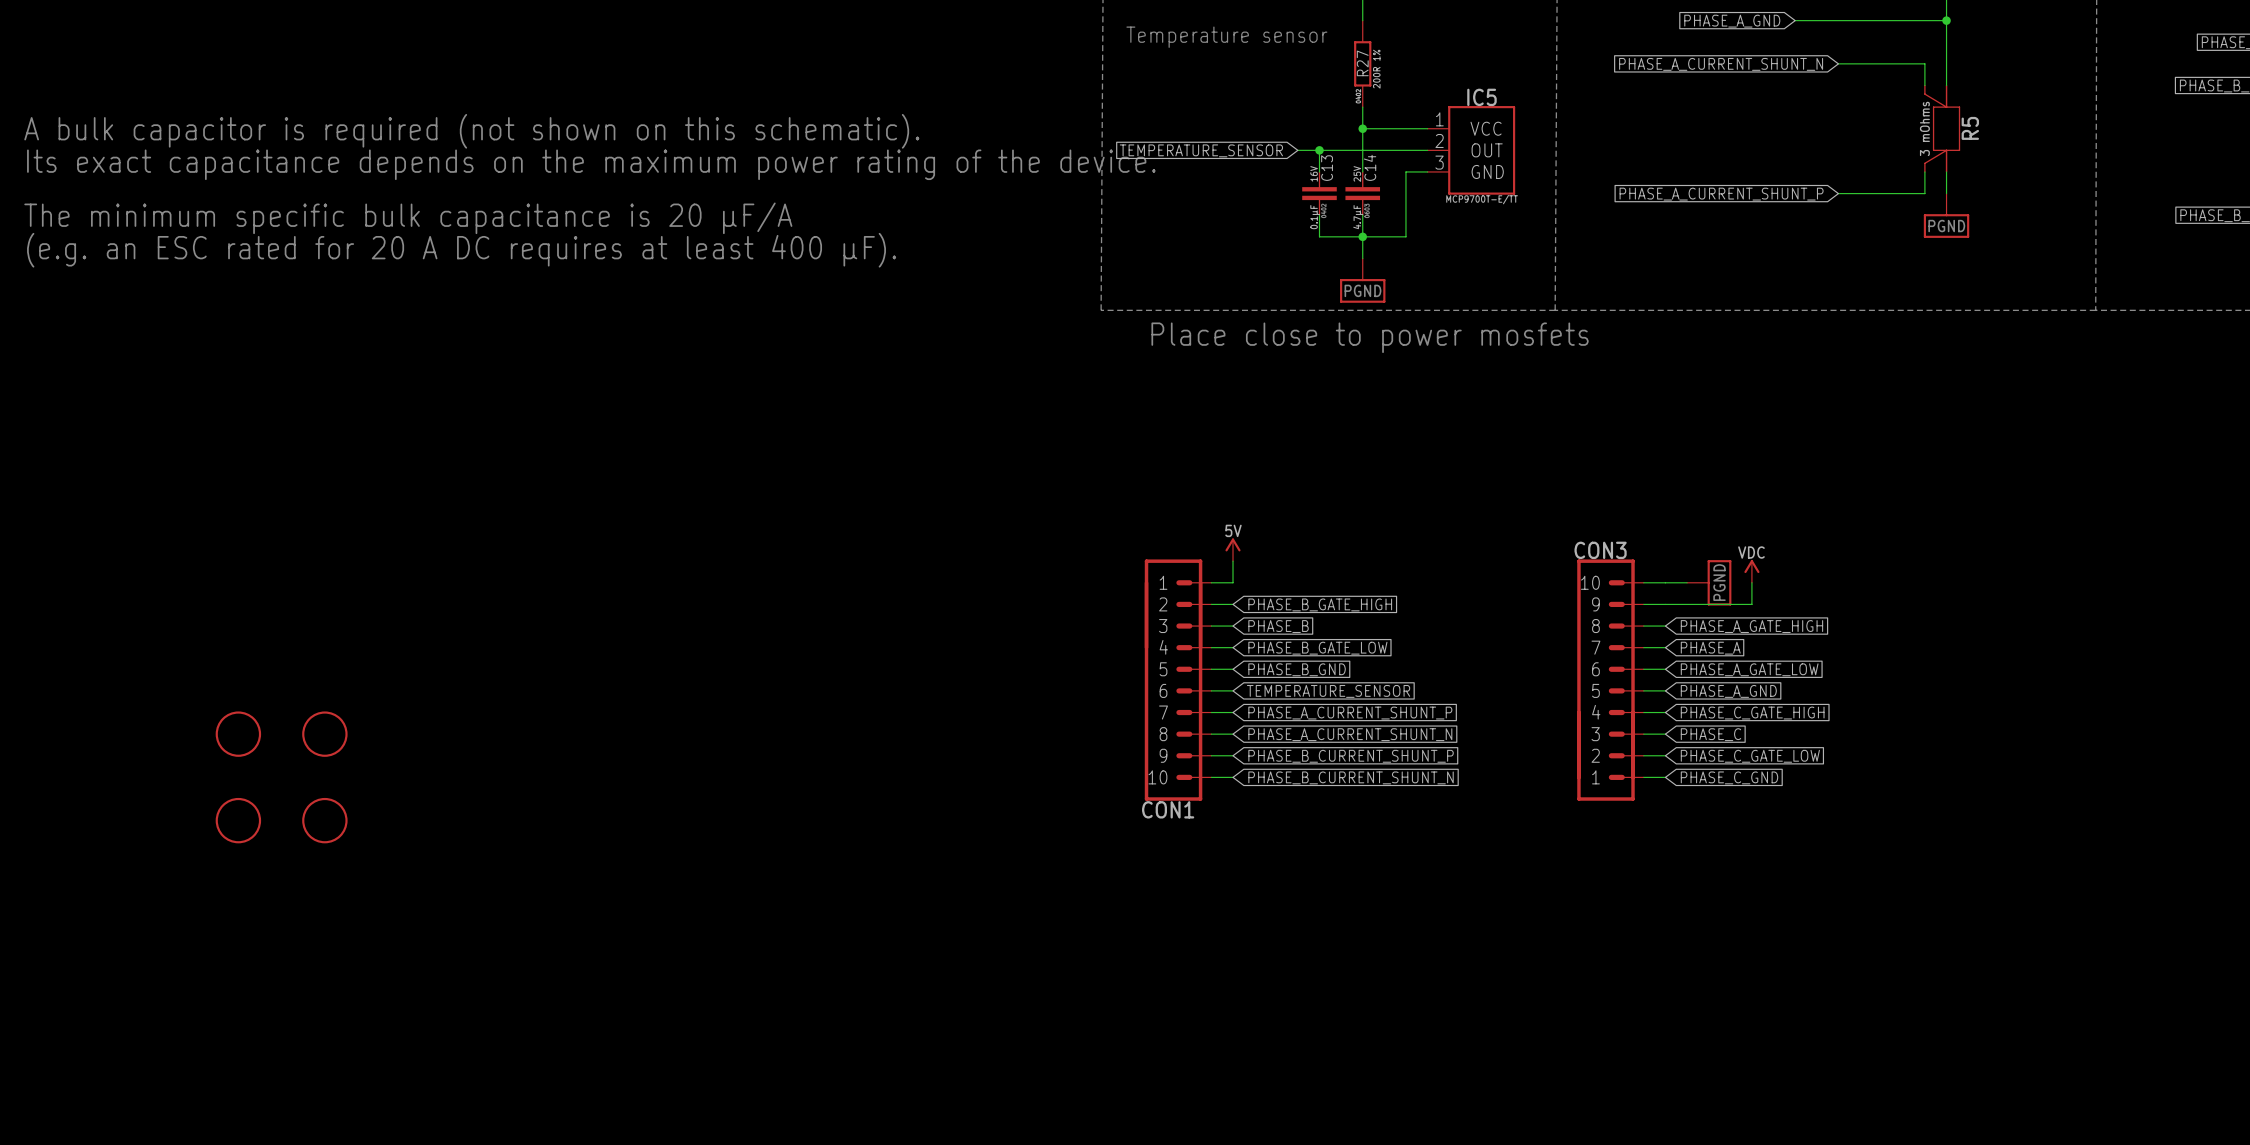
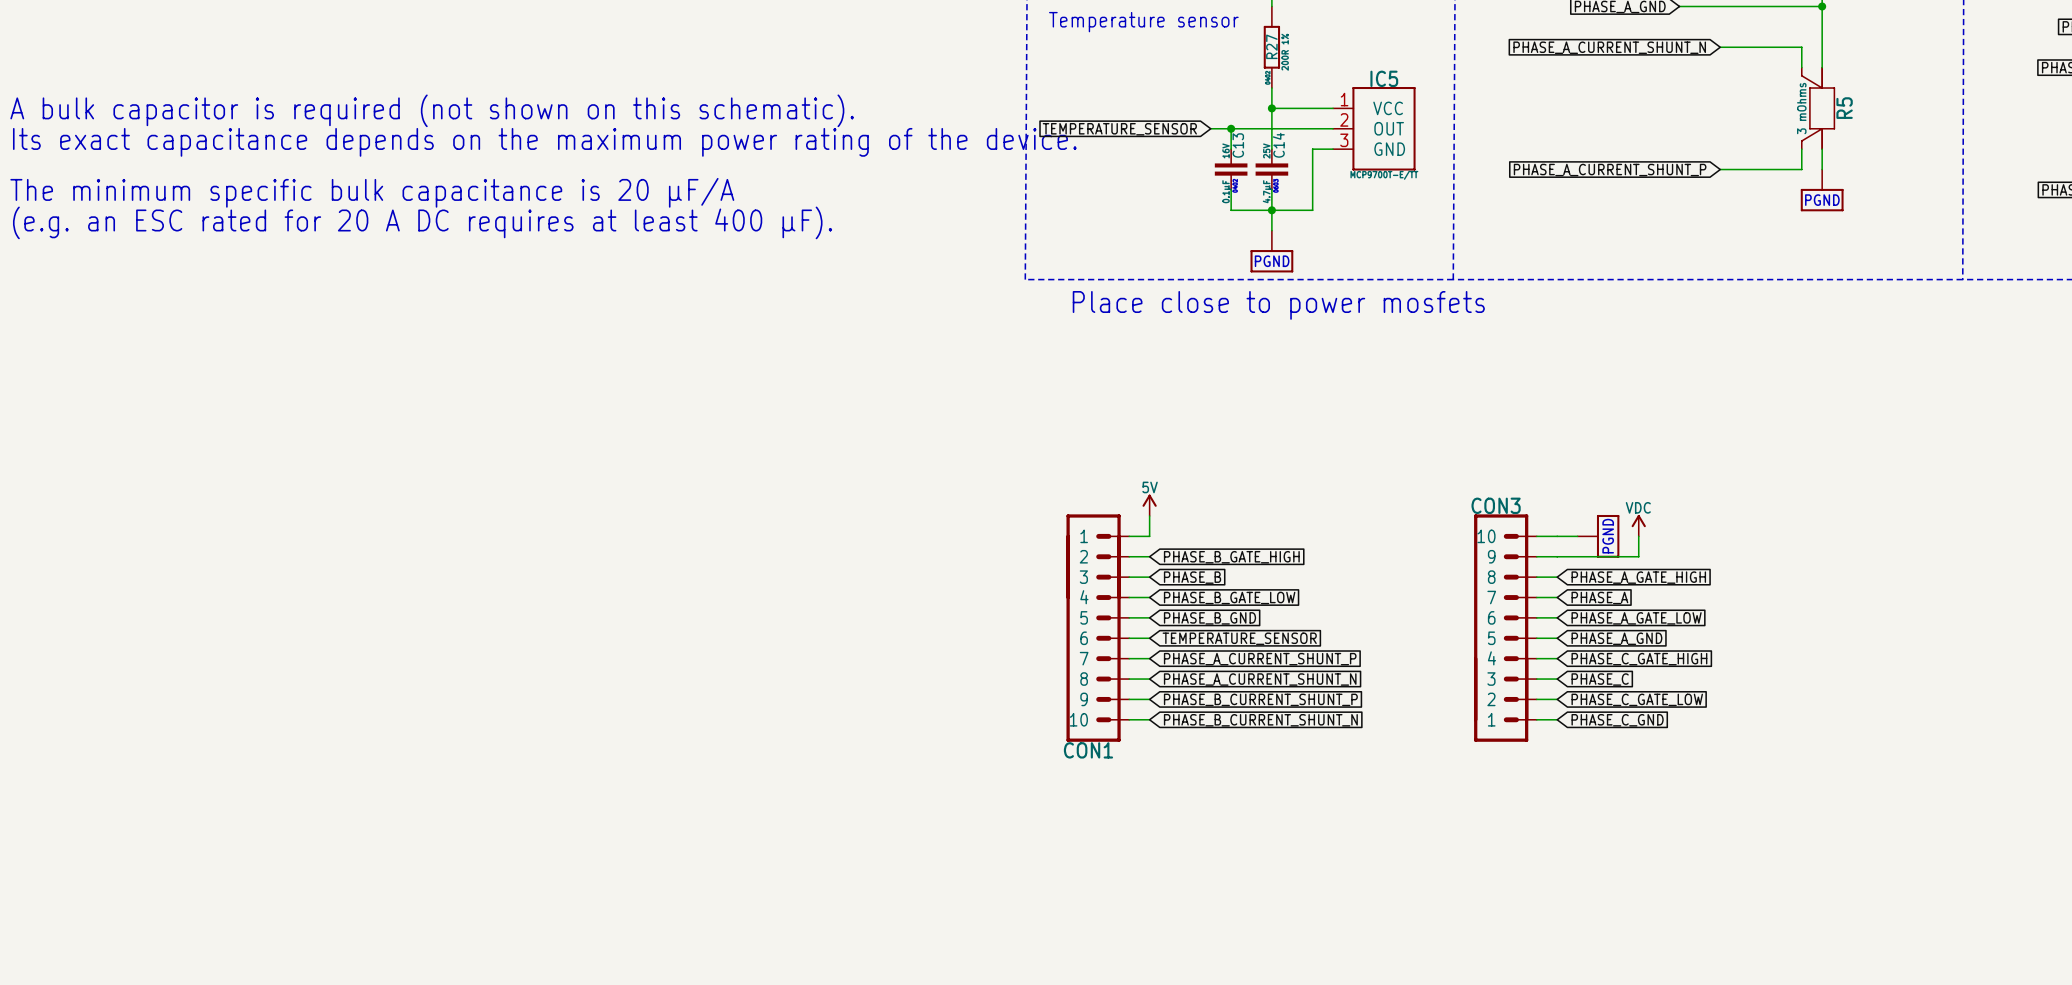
part: (238, 734) -> none
part: (324, 734) -> none
part: (238, 820) -> none
part: (324, 820) -> none

